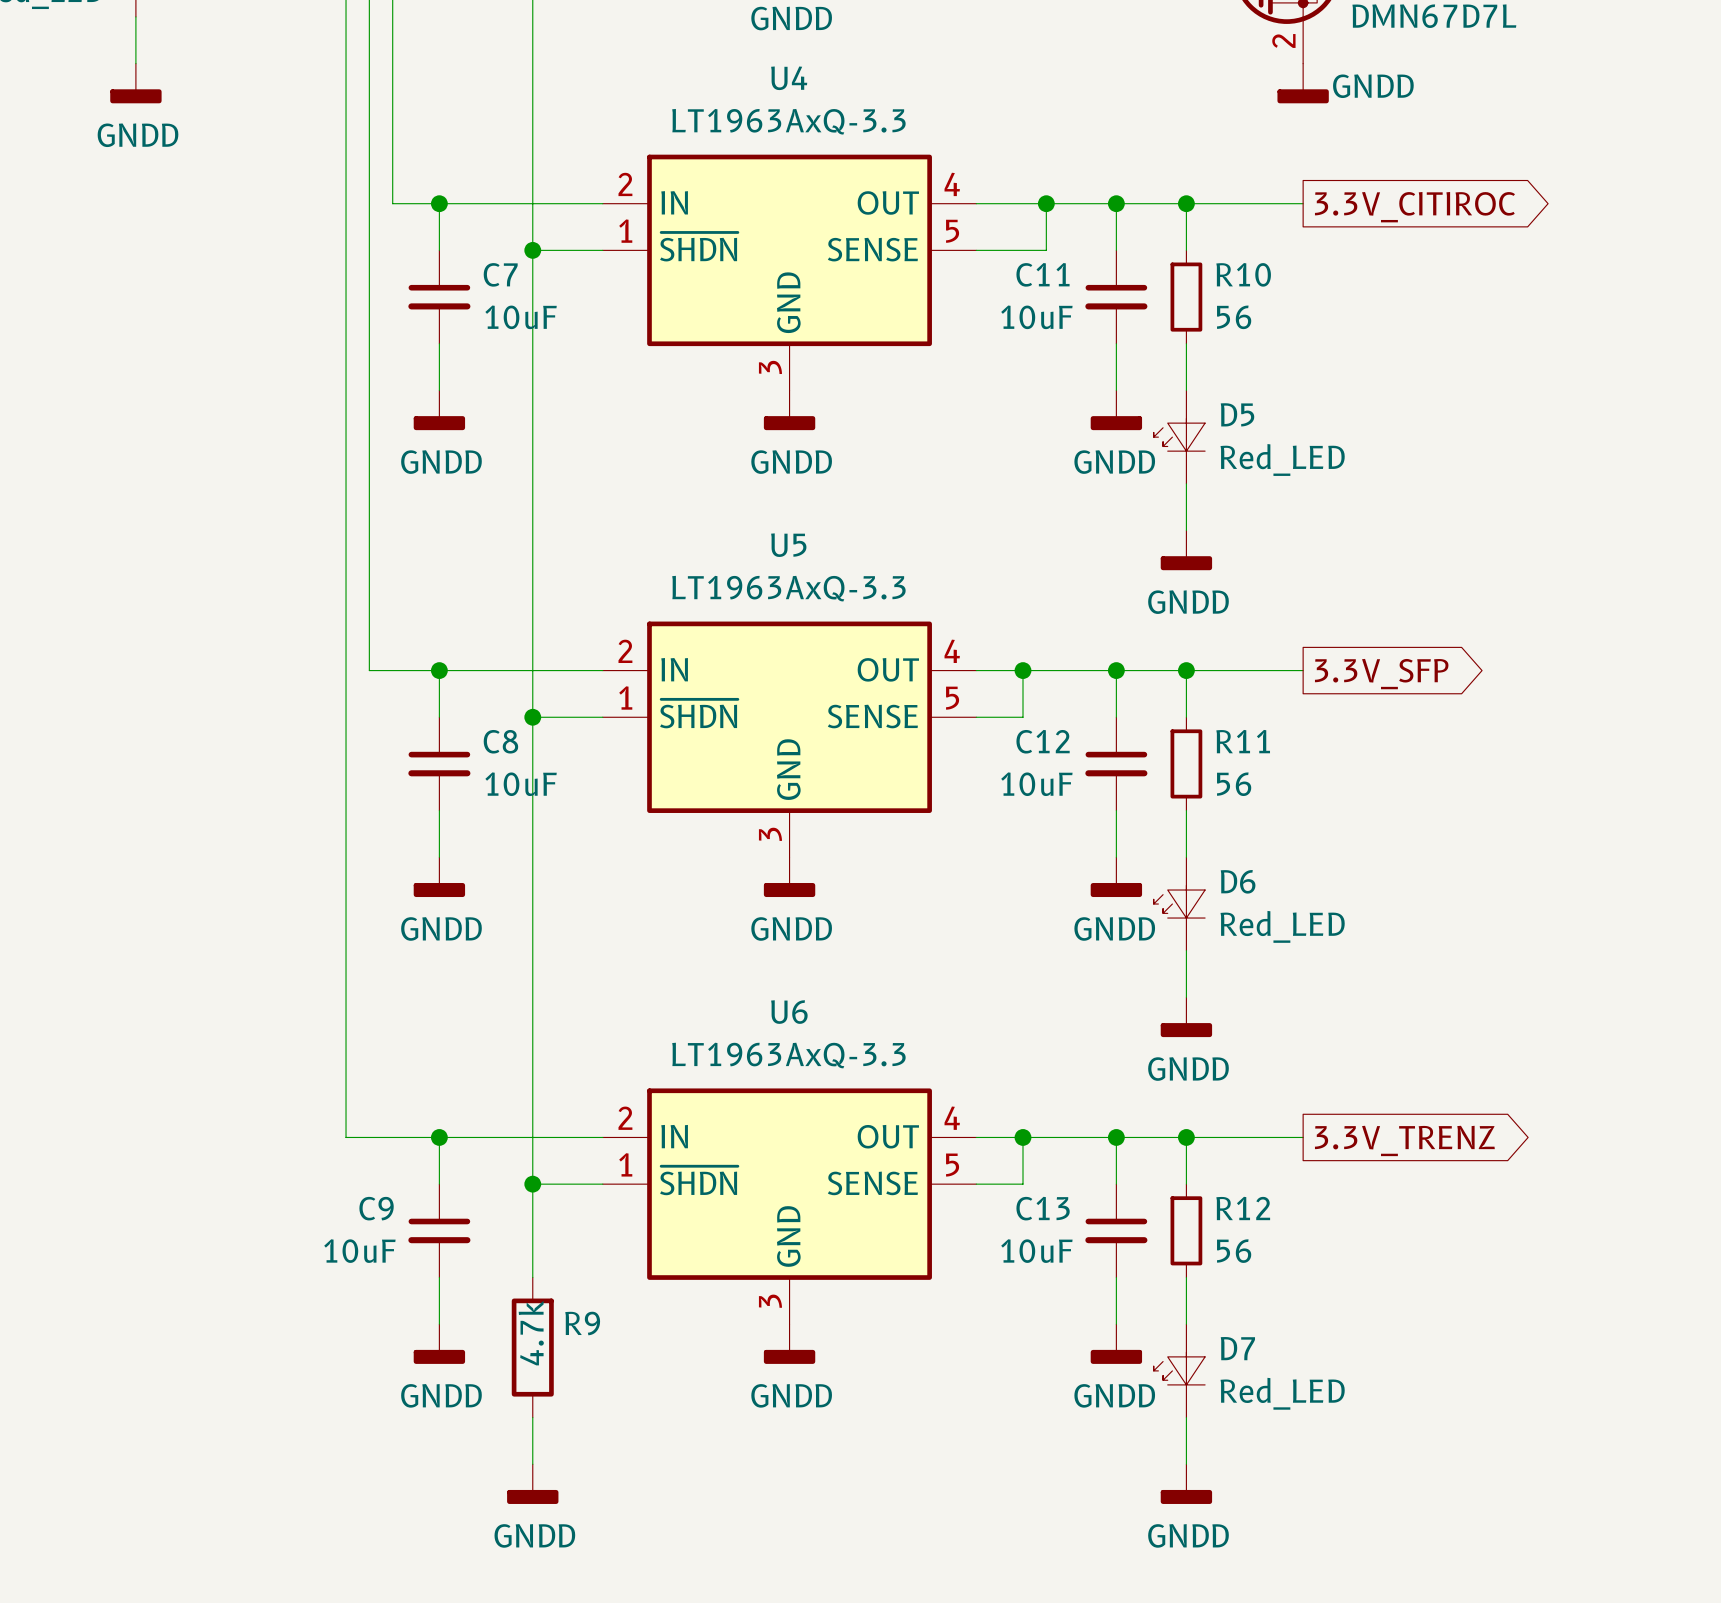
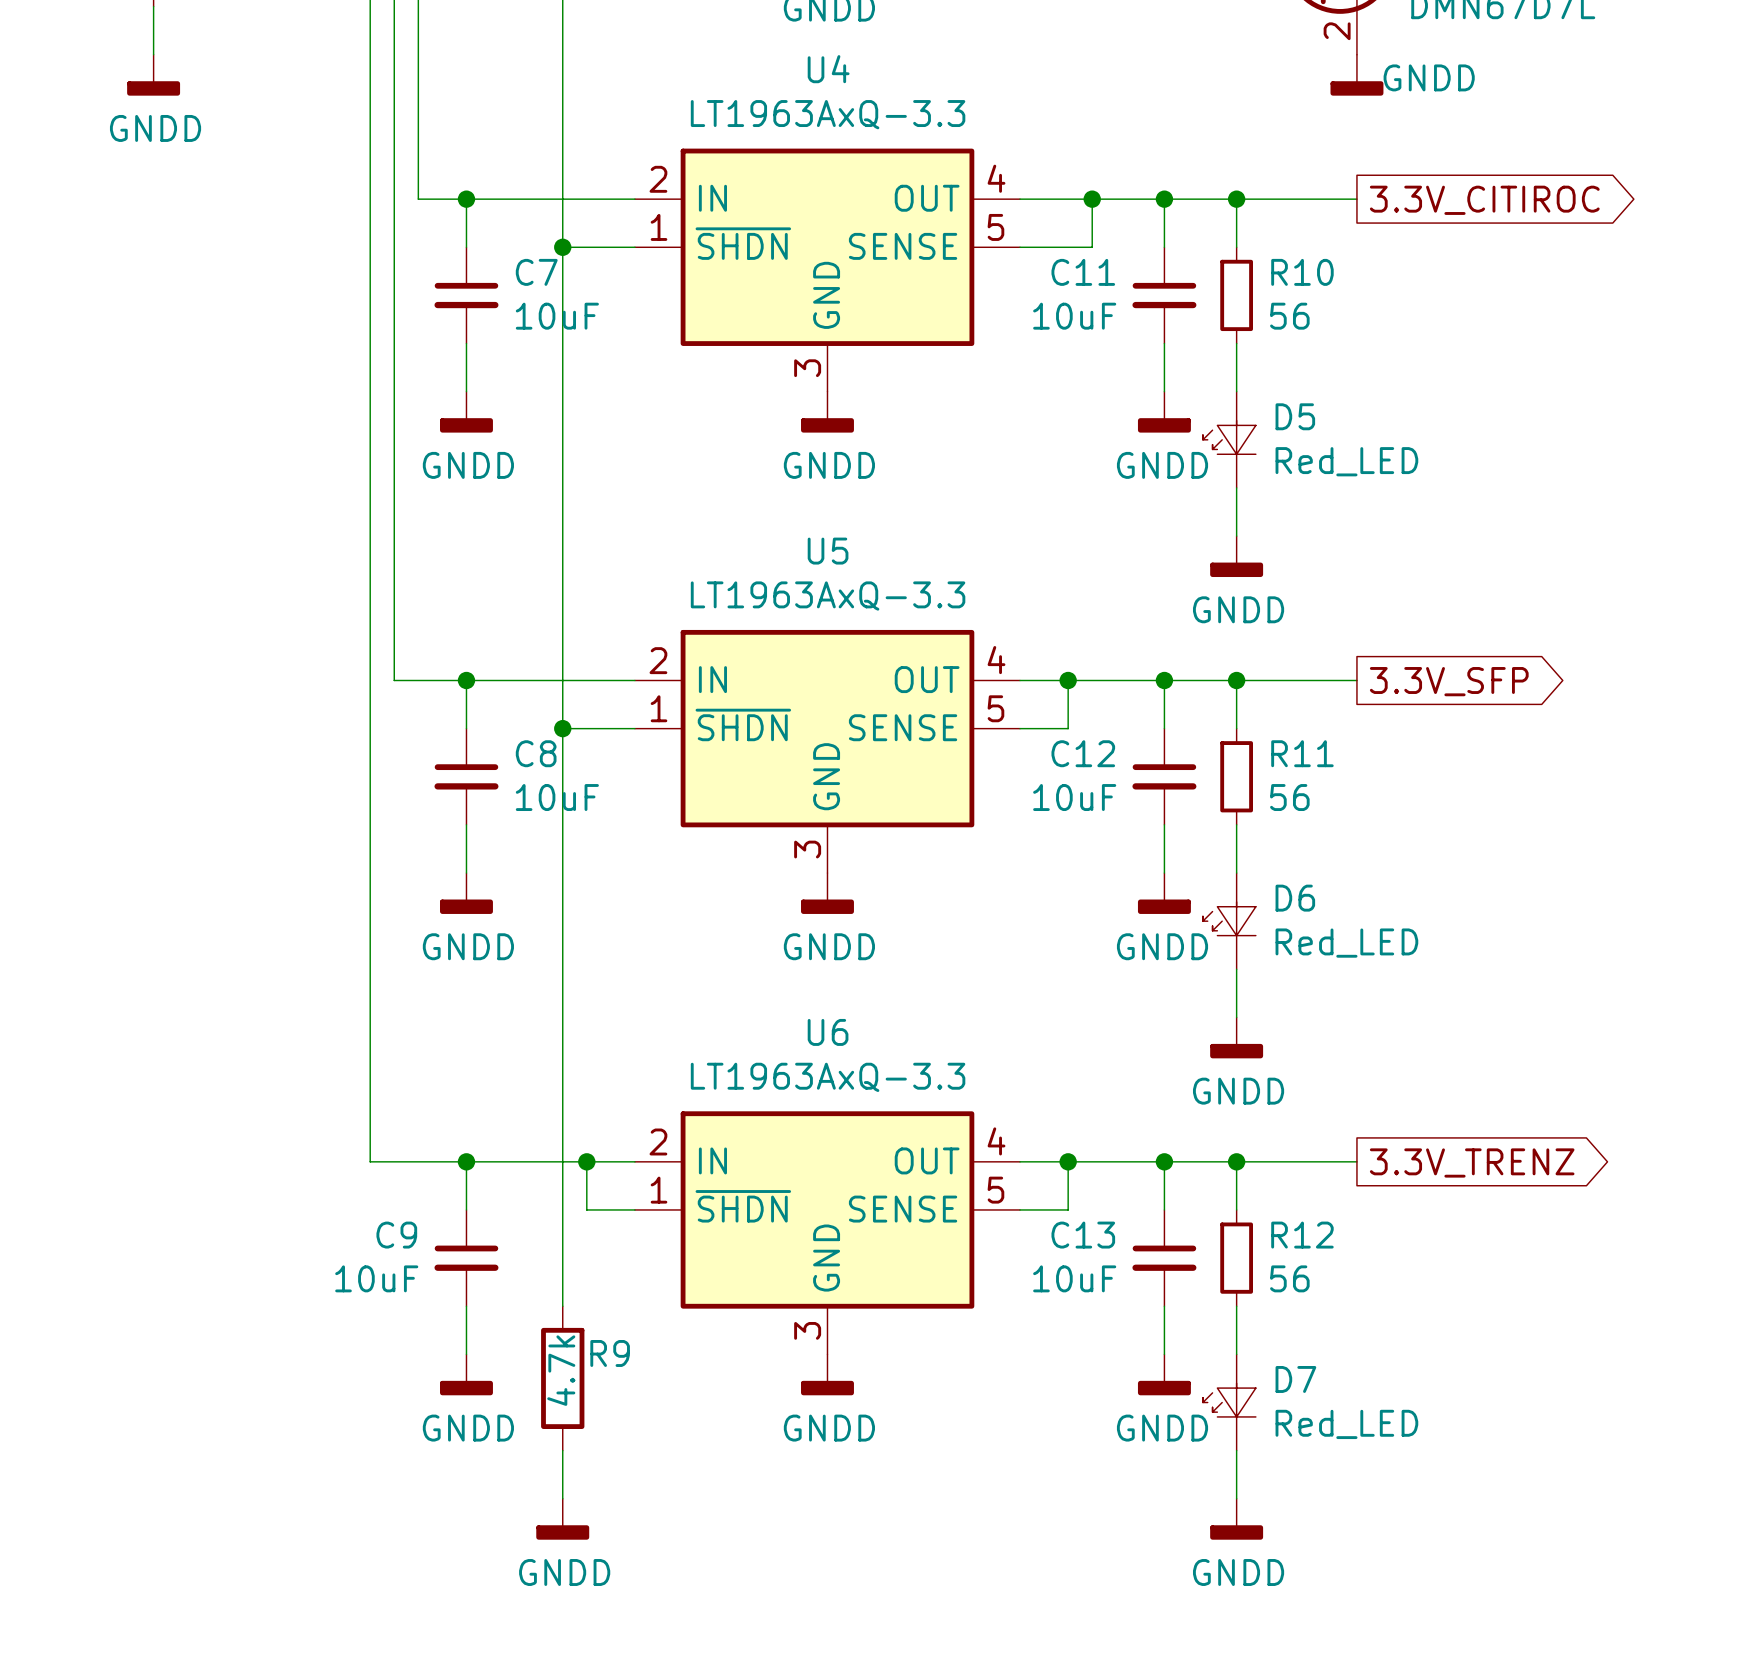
wire: (532, 1184) (556, 1184) -> (586, 1161) (586, 1209)
junction position: (532, 1184) -> (586, 1161)

